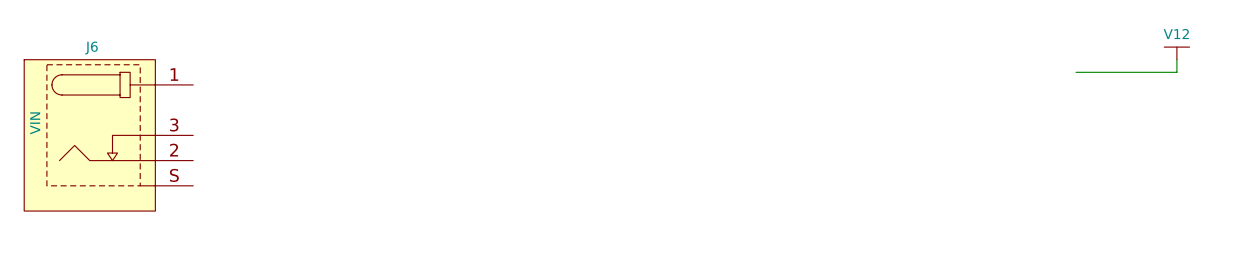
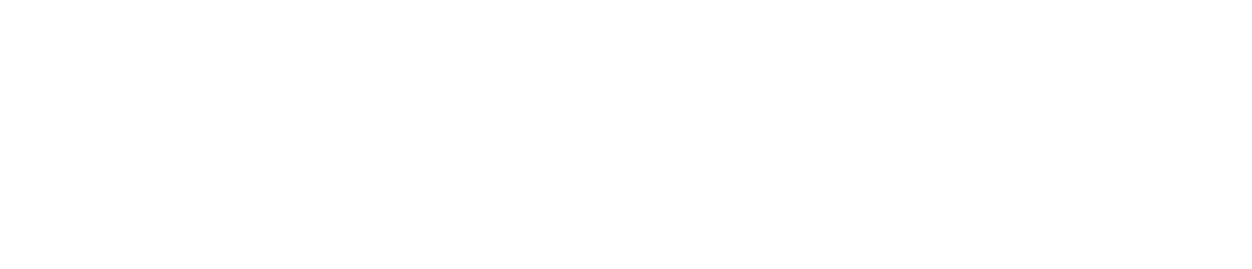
power symbol: V12 (1176, 53) -> none
wire: (1176, 59) (1176, 72) (1076, 72) -> none
J6: VIN (108, 135) -> none

